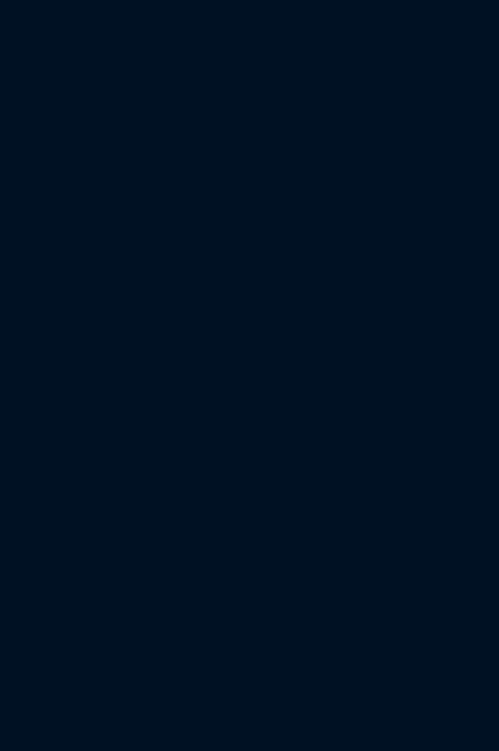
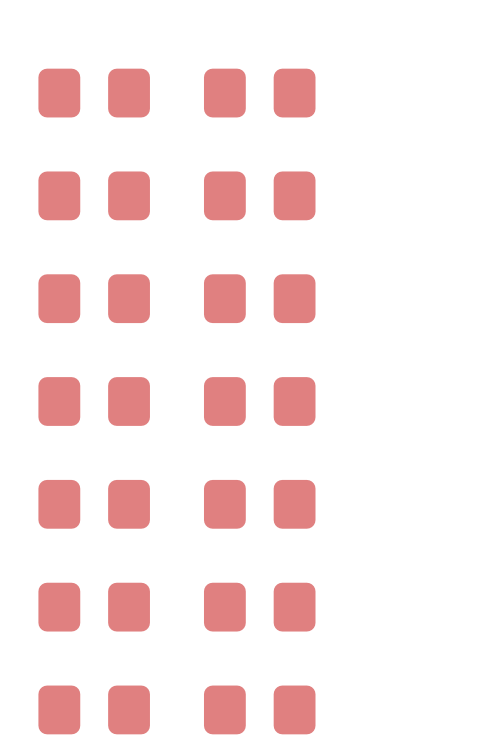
part: none -> (94, 93)
part: none -> (259, 93)
part: none -> (94, 195)
part: none -> (259, 195)
part: none -> (94, 298)
part: none -> (259, 298)
part: none -> (94, 401)
part: none -> (259, 401)
part: none -> (94, 504)
part: none -> (259, 504)
part: none -> (94, 607)
part: none -> (259, 607)
part: none -> (94, 709)
part: none -> (259, 709)

